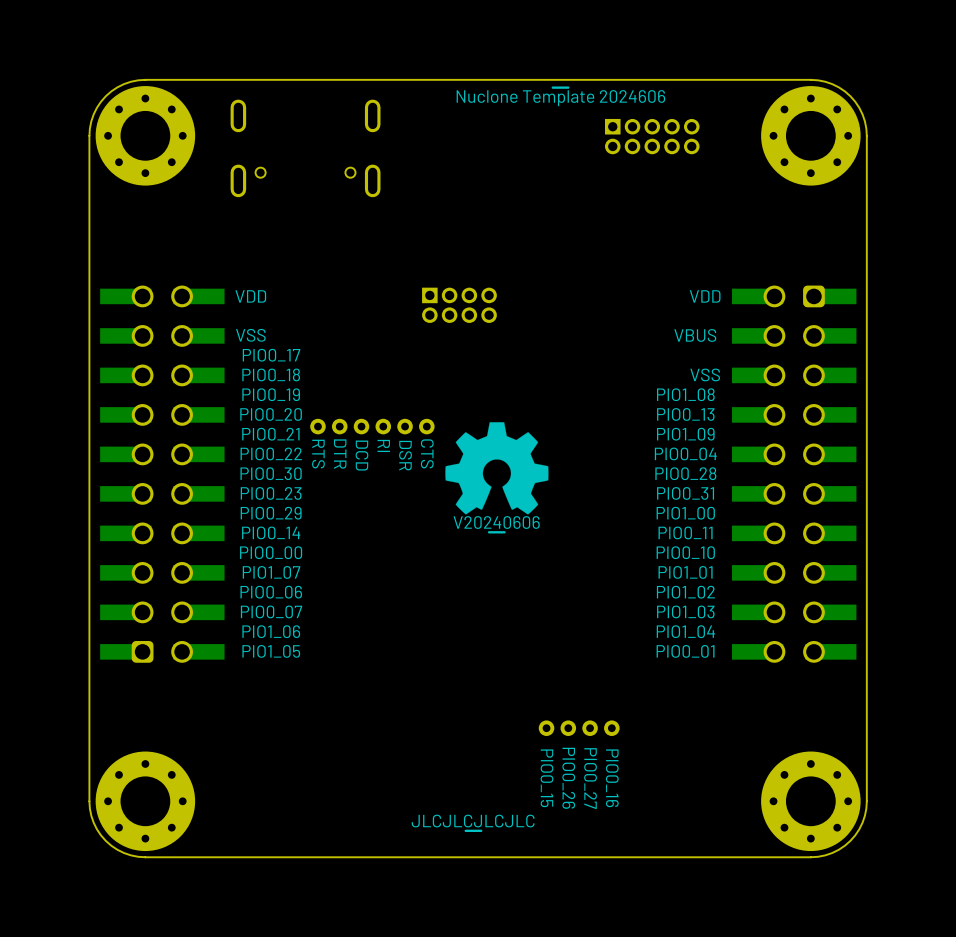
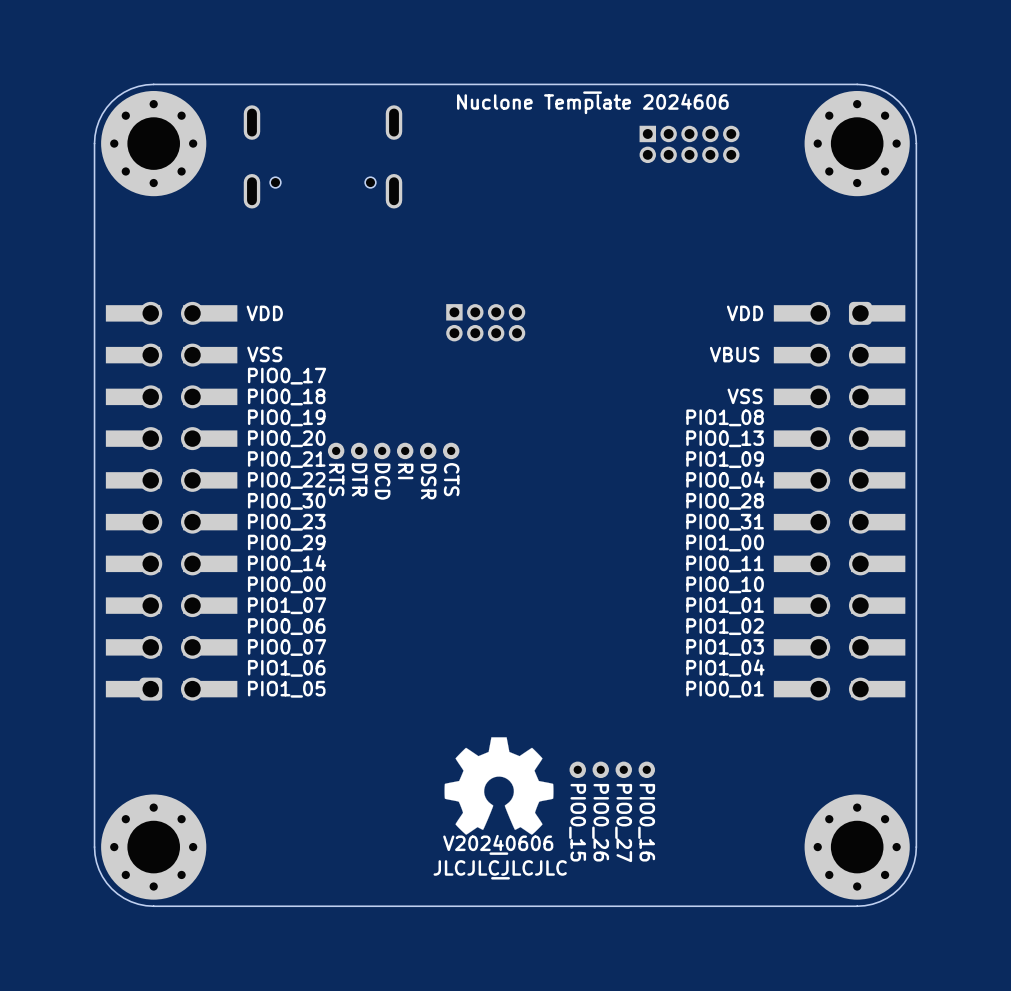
drawing position: (496, 468) -> (499, 786)
drawing position: (496, 532) -> (498, 853)

